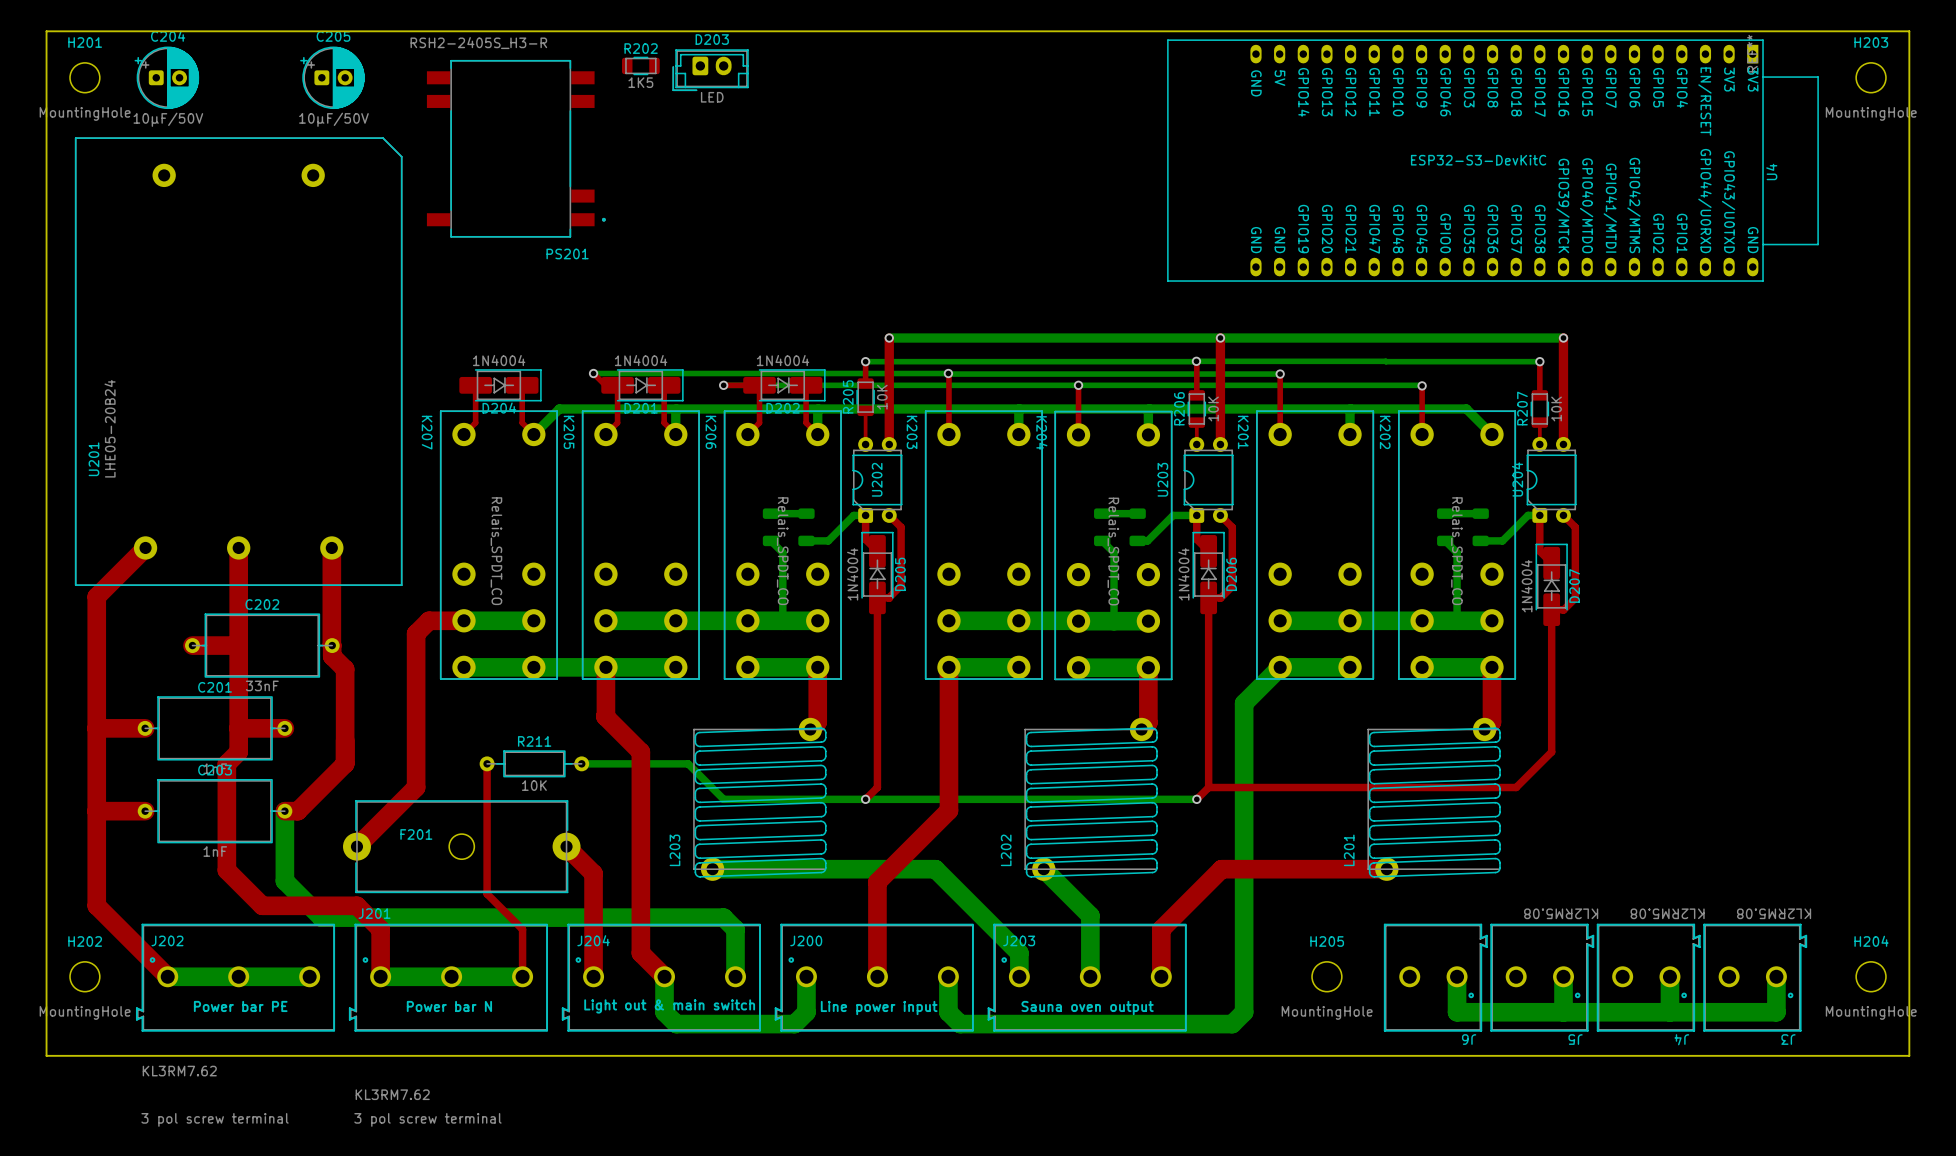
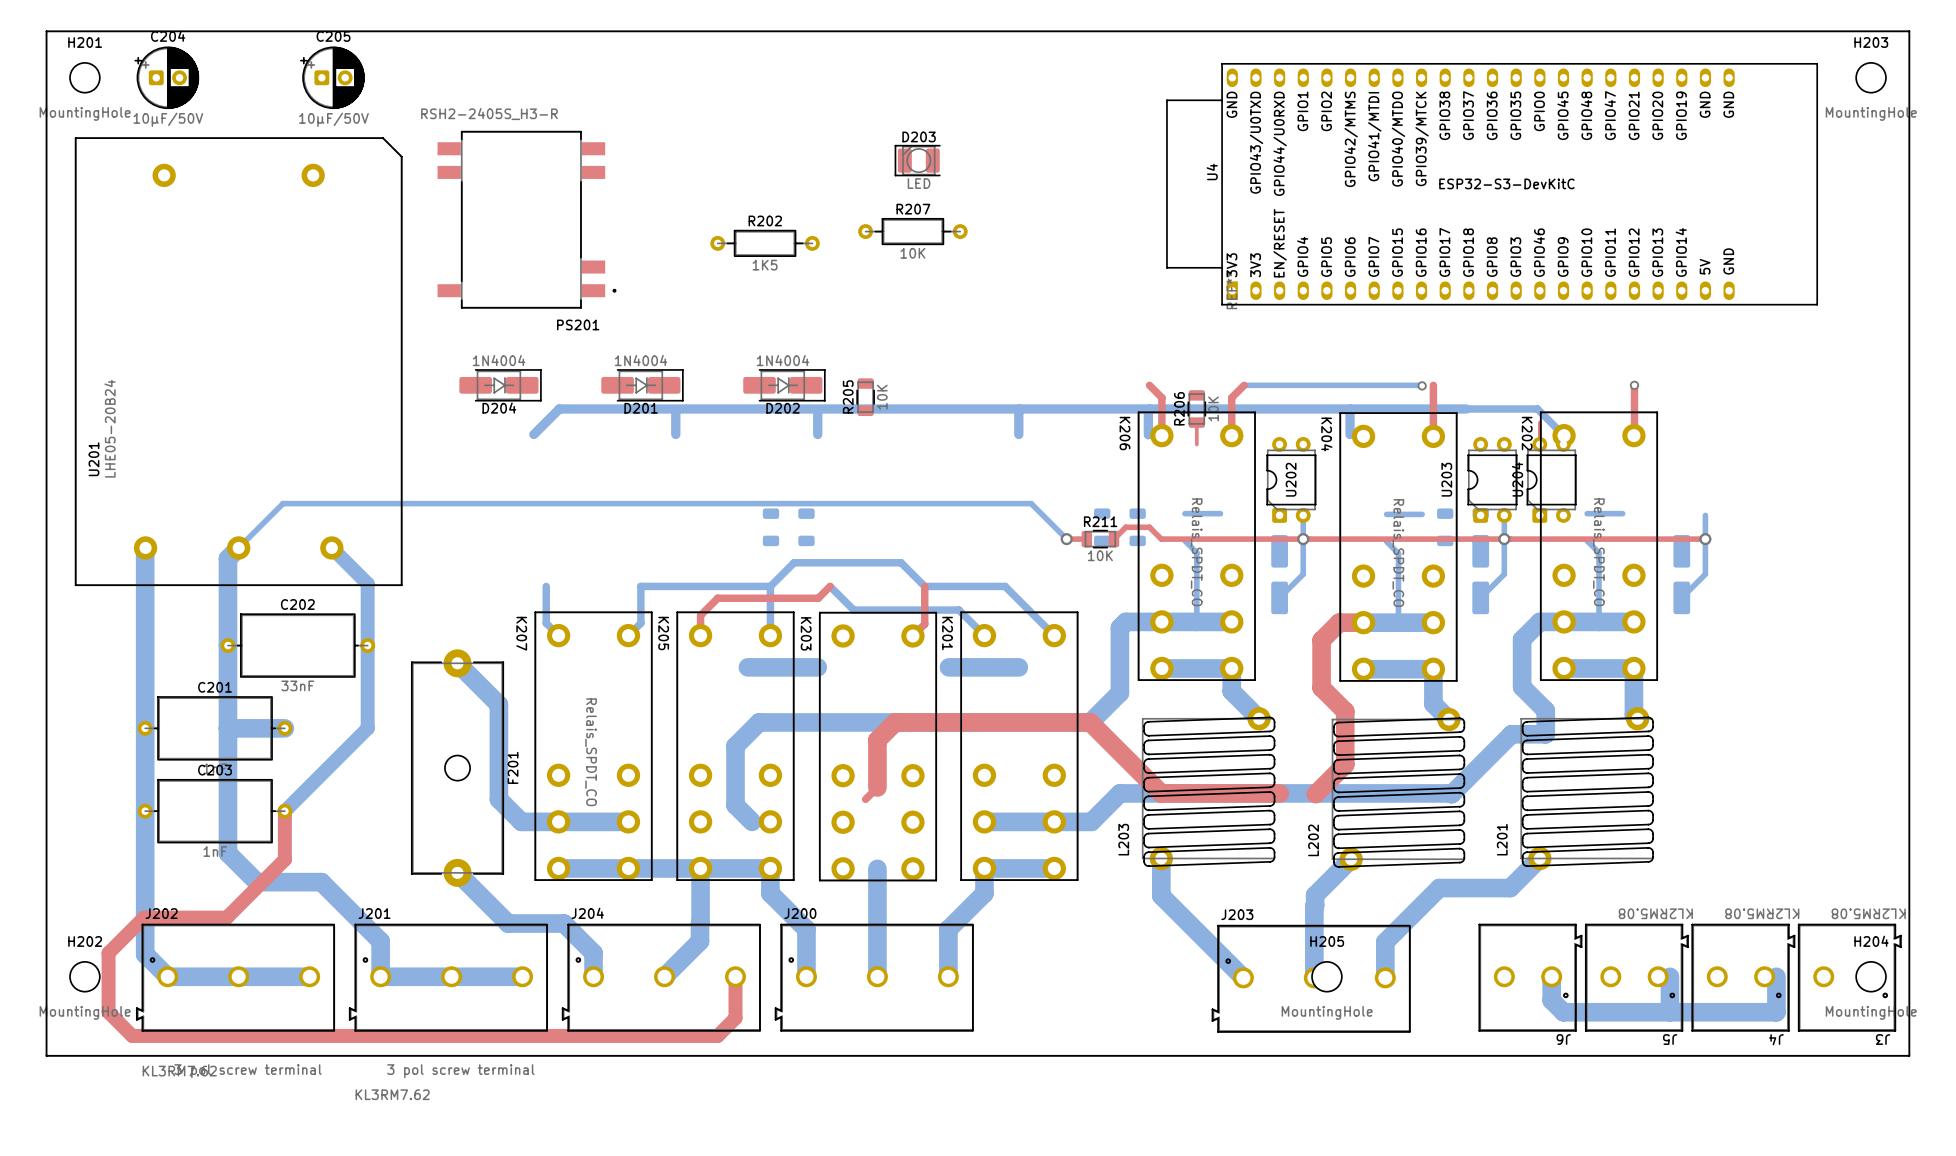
D203 footprint: [672, 49, 749, 91] -> [894, 145, 941, 177]
R202 footprint: [622, 56, 660, 75] -> [710, 230, 820, 257]
PS201 position: (516, 148) -> (526, 219)
U4 rotation: 0° (1492, 160) -> 180° (1492, 184)
top track: (889, 338) (889, 444) -> none
bottom track: (889, 338) (1563, 338) -> none
via: (889, 338) -> none
top track: (1220, 338) (1220, 444) -> none
via: (1220, 338) -> none
top track: (1563, 338) (1563, 444) -> none
via: (1563, 338) -> none
top track: (865, 361) (865, 383) -> none
bottom track: (865, 361) (1539, 361) -> none
via: (865, 361) -> none
top track: (1196, 361) (1196, 395) -> none
via: (1196, 361) -> none
top track: (1539, 361) (1539, 395) -> none
via: (1539, 361) -> none
top track: (593, 373) (605, 385) (617, 385) (617, 422) (605, 434) -> none
bottom track: (593, 373) (1280, 374) -> none
via: (593, 373) -> none
top track: (948, 373) (948, 434) -> none
via: (948, 373) -> none
top track: (1280, 374) (1280, 434) -> none
via: (1280, 374) -> none
top track: (475, 385) (475, 422) (463, 434) -> none
top track: (522, 385) (522, 422) (533, 434) -> none
top track: (664, 385) (664, 422) (675, 434) -> none
top track: (723, 385) (759, 385) (759, 422) (747, 434) -> none
bottom track: (723, 385) (1244, 385) -> none
via: (723, 385) -> none
top track: (806, 385) (806, 422) (817, 434) -> none
top track: (1078, 385) (1078, 434) -> none
via: (1078, 385) -> none
top track: none -> (1149, 385) (1161, 397) (1161, 435)
top track: none -> (1244, 385) (1231, 397) (1231, 435)
top track: (1422, 385) (1422, 434) -> none
top track: none -> (1433, 385) (1433, 436)
top track: none -> (1634, 385) (1633, 435)
via: none -> (1634, 385)
R207 footprint: [1530, 390, 1549, 428] -> [858, 218, 968, 245]
bottom track: (1466, 408) (1491, 434) -> (1466, 408) (1537, 408) (1564, 435)
R207 name position: R207 (1522, 408) -> R207 (913, 209)
R207 value position: 10K (1556, 408) -> 10K (912, 253)
top track: (865, 410) (865, 444) -> none
U202 position: (877, 479) -> (1291, 479)
U203 position: (1208, 479) -> (1492, 479)
bottom track: (770, 513) (806, 513) -> none
bottom track: (1102, 513) (1137, 513) -> (1184, 513) (1220, 513)
bottom track: (1445, 513) (1480, 513) -> (1386, 514) (1422, 514)
bottom track: none -> (1587, 513) (1622, 513)
top track: (865, 515) (865, 539) (877, 551) -> none
bottom track: (865, 515) (853, 515) (828, 540) (806, 540) -> none
top track: (889, 515) (901, 527) (901, 586) (889, 598) (877, 597) (877, 740) -> (1279, 793) (1161, 793) (1090, 722) (895, 722) (877, 740)
top track: (1196, 515) (1196, 539) (1208, 551) -> none
bottom track: (1196, 515) (1173, 515) (1147, 540) (1137, 540) -> none
top track: (1220, 515) (1232, 527) (1232, 586) (1220, 598) (1208, 597) (1208, 787) -> none
bottom track: none -> (1303, 515) (1303, 574) (1279, 597)
bottom track: none -> (1504, 515) (1504, 574) (1480, 597)
top track: (1539, 515) (1539, 551) (1551, 563) -> none
bottom track: (1539, 515) (1528, 515) (1502, 540) (1480, 540) -> none
top track: (1563, 515) (1575, 527) (1575, 598) (1563, 610) (1551, 609) (1551, 752) (1516, 787) (1208, 787) -> none
bottom track: none -> (1705, 515) (1705, 574) (1681, 597)
top track: none -> (1066, 539) (1086, 539)
bottom track: none -> (1066, 539) (1031, 503) (283, 503) (227, 558) (227, 853) (256, 882) (321, 882) (380, 941) (380, 976)
via: none -> (1066, 539)
top track: none -> (1114, 539) (1125, 527) (1149, 527) (1161, 539) (1705, 539)
via: none -> (1303, 539)
via: none -> (1504, 539)
via: none -> (1705, 539)
bottom track: (770, 540) (782, 552) (782, 620) -> none
bottom track: (1102, 540) (1114, 552) (1114, 621) -> none
bottom track: none -> (1184, 540) (1196, 552) (1196, 621)
bottom track: (1445, 540) (1457, 552) (1457, 620) -> none
bottom track: none -> (1587, 540) (1598, 552) (1598, 621)
bottom track: none -> (1386, 541) (1398, 553) (1398, 622)
K207 position: (498, 545) -> (593, 746)
K205 position: (640, 545) -> (735, 746)
K206 position: (782, 545) -> (1196, 546)
K203 position: (983, 545) -> (878, 746)
K204 position: (1113, 545) -> (1398, 546)
K201 position: (1315, 545) -> (1019, 746)
K202 position: (1457, 545) -> (1598, 546)
top track: (145, 547) (96, 596) (96, 905) (167, 976) -> none
bottom track: none -> (145, 547) (145, 954) (167, 976)
top track: (238, 547) (238, 752) (226, 763) (226, 870) (262, 905) (356, 905) (380, 929) (380, 976) -> none
top track: (331, 547) (332, 656) (345, 669) (345, 763) (297, 811) (284, 811) -> (735, 976) (735, 1018) (717, 1035) (132, 1035) (108, 1012) (108, 953) (144, 917) (226, 917) (284, 859) (284, 811)
D205: 1N4004 (877, 573) -> none
D206: 1N4004 (1208, 573) -> none
part: none -> (1279, 574)
part: none -> (1480, 574)
D207 side: top (1551, 584) -> bottom (1681, 574)
bottom track: none -> (546, 586) (546, 623) (558, 635)
bottom track: none -> (770, 586) (640, 586) (640, 623) (628, 635)
bottom track: none -> (770, 586) (770, 635)
bottom track: none -> (770, 586) (794, 562) (901, 562) (924, 586) (1005, 586) (1054, 635)
top track: none -> (830, 586) (818, 598) (717, 598) (700, 615) (700, 635)
bottom track: none -> (830, 586) (853, 610) (958, 610) (984, 635)
top track: none -> (924, 586) (924, 624) (912, 635)
top track: (463, 620) (429, 620) (416, 633) (416, 787) (356, 846) -> none
bottom track: (463, 620) (533, 620) -> none
bottom track: (605, 620) (817, 620) -> none
bottom track: (948, 620) (1148, 621) -> none
bottom track: (1280, 620) (1491, 620) -> none
bottom track: none -> (1231, 621) (1125, 621) (1119, 627) (1119, 692) (1090, 722) (759, 722) (735, 746) (735, 805) (752, 821)
bottom track: none -> (1633, 621) (1539, 621) (1522, 639) (1522, 686) (1545, 710) (1545, 734) (1511, 734) (1451, 794) (1119, 793) (1091, 821) (984, 821)
top track: none -> (1363, 622) (1339, 622) (1321, 640) (1321, 687) (1345, 711) (1345, 764) (1315, 794)
top track: (192, 645) (238, 645) -> none
C202 position: (262, 645) -> (297, 645)
bottom track: none -> (457, 663) (498, 704) (498, 799) (521, 821) (628, 821)
bottom track: (463, 667) (675, 667) -> none
top track: (605, 667) (605, 716) (640, 752) (640, 953) (664, 976) -> none
top track: (817, 667) (817, 722) (810, 729) -> none
top track: (948, 667) (948, 810) (877, 882) (877, 976) -> none
bottom track: (1078, 667) (1148, 667) -> none
top track: (1148, 667) (1148, 722) (1141, 729) -> none
bottom track: (1350, 667) (1280, 667) (1244, 703) (1244, 1012) (1232, 1024) (960, 1024) (948, 1012) (948, 976) -> (1054, 868) (984, 868) (984, 893) (948, 929) (948, 976)
bottom track: (1422, 667) (1491, 667) -> (1363, 622) (1433, 622)
top track: (1491, 667) (1491, 722) (1484, 729) -> none
bottom track: none -> (1161, 668) (1231, 668) (1231, 691) (1259, 718)
bottom track: none -> (1564, 668) (1633, 668) (1633, 715) (1637, 718)
bottom track: none -> (1363, 669) (1433, 669) (1433, 703) (1448, 719)
top track: (96, 728) (145, 728) -> none
bottom track: none -> (227, 728) (284, 728)
top track: (238, 728) (284, 728) -> none
top track width: thin (877, 740) (877, 787) -> thick (877, 740) (877, 787)
R211 footprint: [479, 750, 590, 778] -> [1081, 530, 1120, 549]
top track: (487, 763) (487, 893) (522, 929) (522, 976) -> none
bottom track: (581, 763) (688, 763) (723, 799) (1196, 799) -> none
top track: (1208, 787) (1196, 799) -> none
L203 position: (759, 799) -> (1208, 788)
via: (865, 799) -> none
L202 position: (1091, 799) -> (1398, 789)
via: (1196, 799) -> none
L201 position: (1434, 799) -> (1587, 788)
top track: (96, 811) (145, 811) -> none
bottom track: (284, 811) (284, 881) (321, 917) (723, 917) (735, 929) (735, 976) -> (284, 811) (367, 728) (367, 583) (331, 547)
F201 name position: F201 (416, 834) -> F201 (513, 767)
F201 rotation: 0° (461, 846) -> 90° clockwise (457, 768)
top track: (566, 846) (593, 873) (593, 976) -> none
bottom track: none -> (1161, 858) (1161, 895) (1243, 977)
bottom track: none -> (1539, 858) (1510, 888) (1439, 888) (1385, 942) (1385, 977)
bottom track: none -> (1351, 859) (1315, 895) (1315, 977)
bottom track: none -> (700, 868) (700, 941) (664, 976)
bottom track: none -> (877, 868) (877, 976)
bottom track: (712, 869) (935, 869) (1019, 953) (1019, 976) -> none
bottom track: (1043, 869) (1090, 915) (1090, 976) -> none
top track: (1386, 869) (1221, 869) (1161, 929) (1161, 976) -> none
bottom track: none -> (457, 872) (508, 923) (563, 923) (593, 953) (593, 976)
J202 name position: J202 (167, 940) -> J202 (161, 913)
J204 name position: J204 (593, 940) -> J204 (587, 913)
J200 name position: J200 (806, 940) -> J200 (800, 913)
J203 name position: J203 (1019, 940) -> J203 (1237, 914)
bottom track: (664, 976) (664, 1012) (676, 1024) (794, 1024) (806, 1012) (806, 976) -> (558, 868) (770, 868) (770, 893) (806, 929) (806, 976)
bottom track: (1457, 976) (1457, 1012) (1563, 1012) (1563, 976) -> none
bottom track: none -> (1551, 976) (1551, 1000) (1563, 1012)
J203 position: (1087, 977) -> (1311, 978)
J6 position: (1435, 977) -> (1530, 977)
J5 position: (1542, 977) -> (1636, 977)
J4 position: (1648, 977) -> (1743, 977)
J3 position: (1755, 977) -> (1849, 977)
text: Power bar PE (240, 1006) -> none
text: Power bar N (449, 1006) -> none
text: Light out & main switch (669, 1006) -> none
text: Line power input (879, 1008) -> none
text: Sauna oven output (1087, 1008) -> none
J202 text position: 3 pol screw terminal (215, 1119) -> 3 pol screw terminal (248, 1071)
J201 text position: 3 pol screw terminal (427, 1119) -> 3 pol screw terminal (460, 1071)

